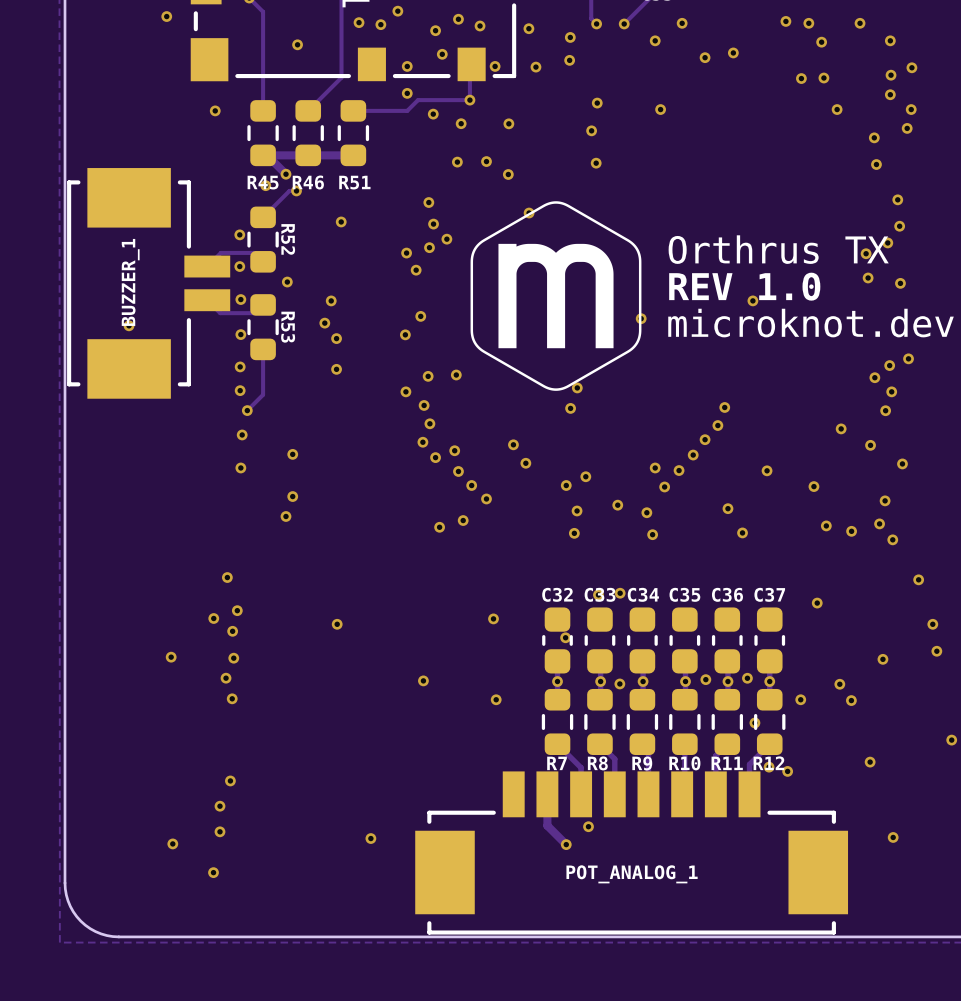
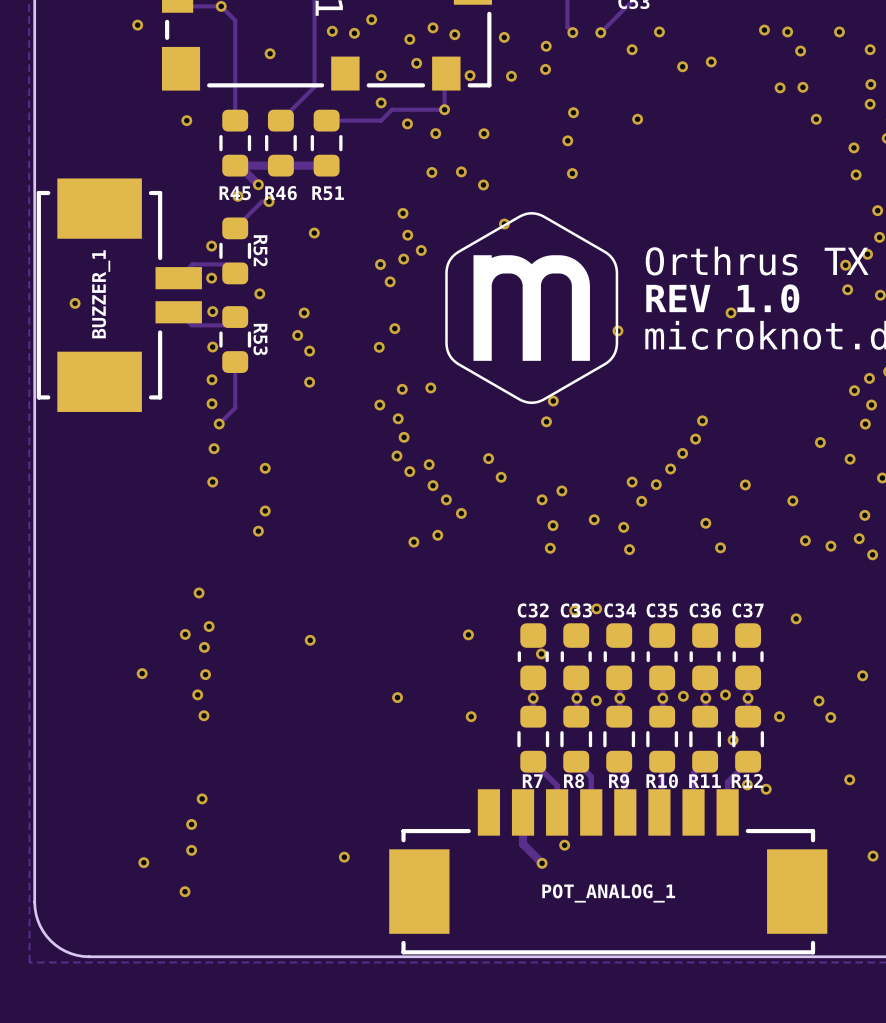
via position: (129, 325) -> (75, 303)

